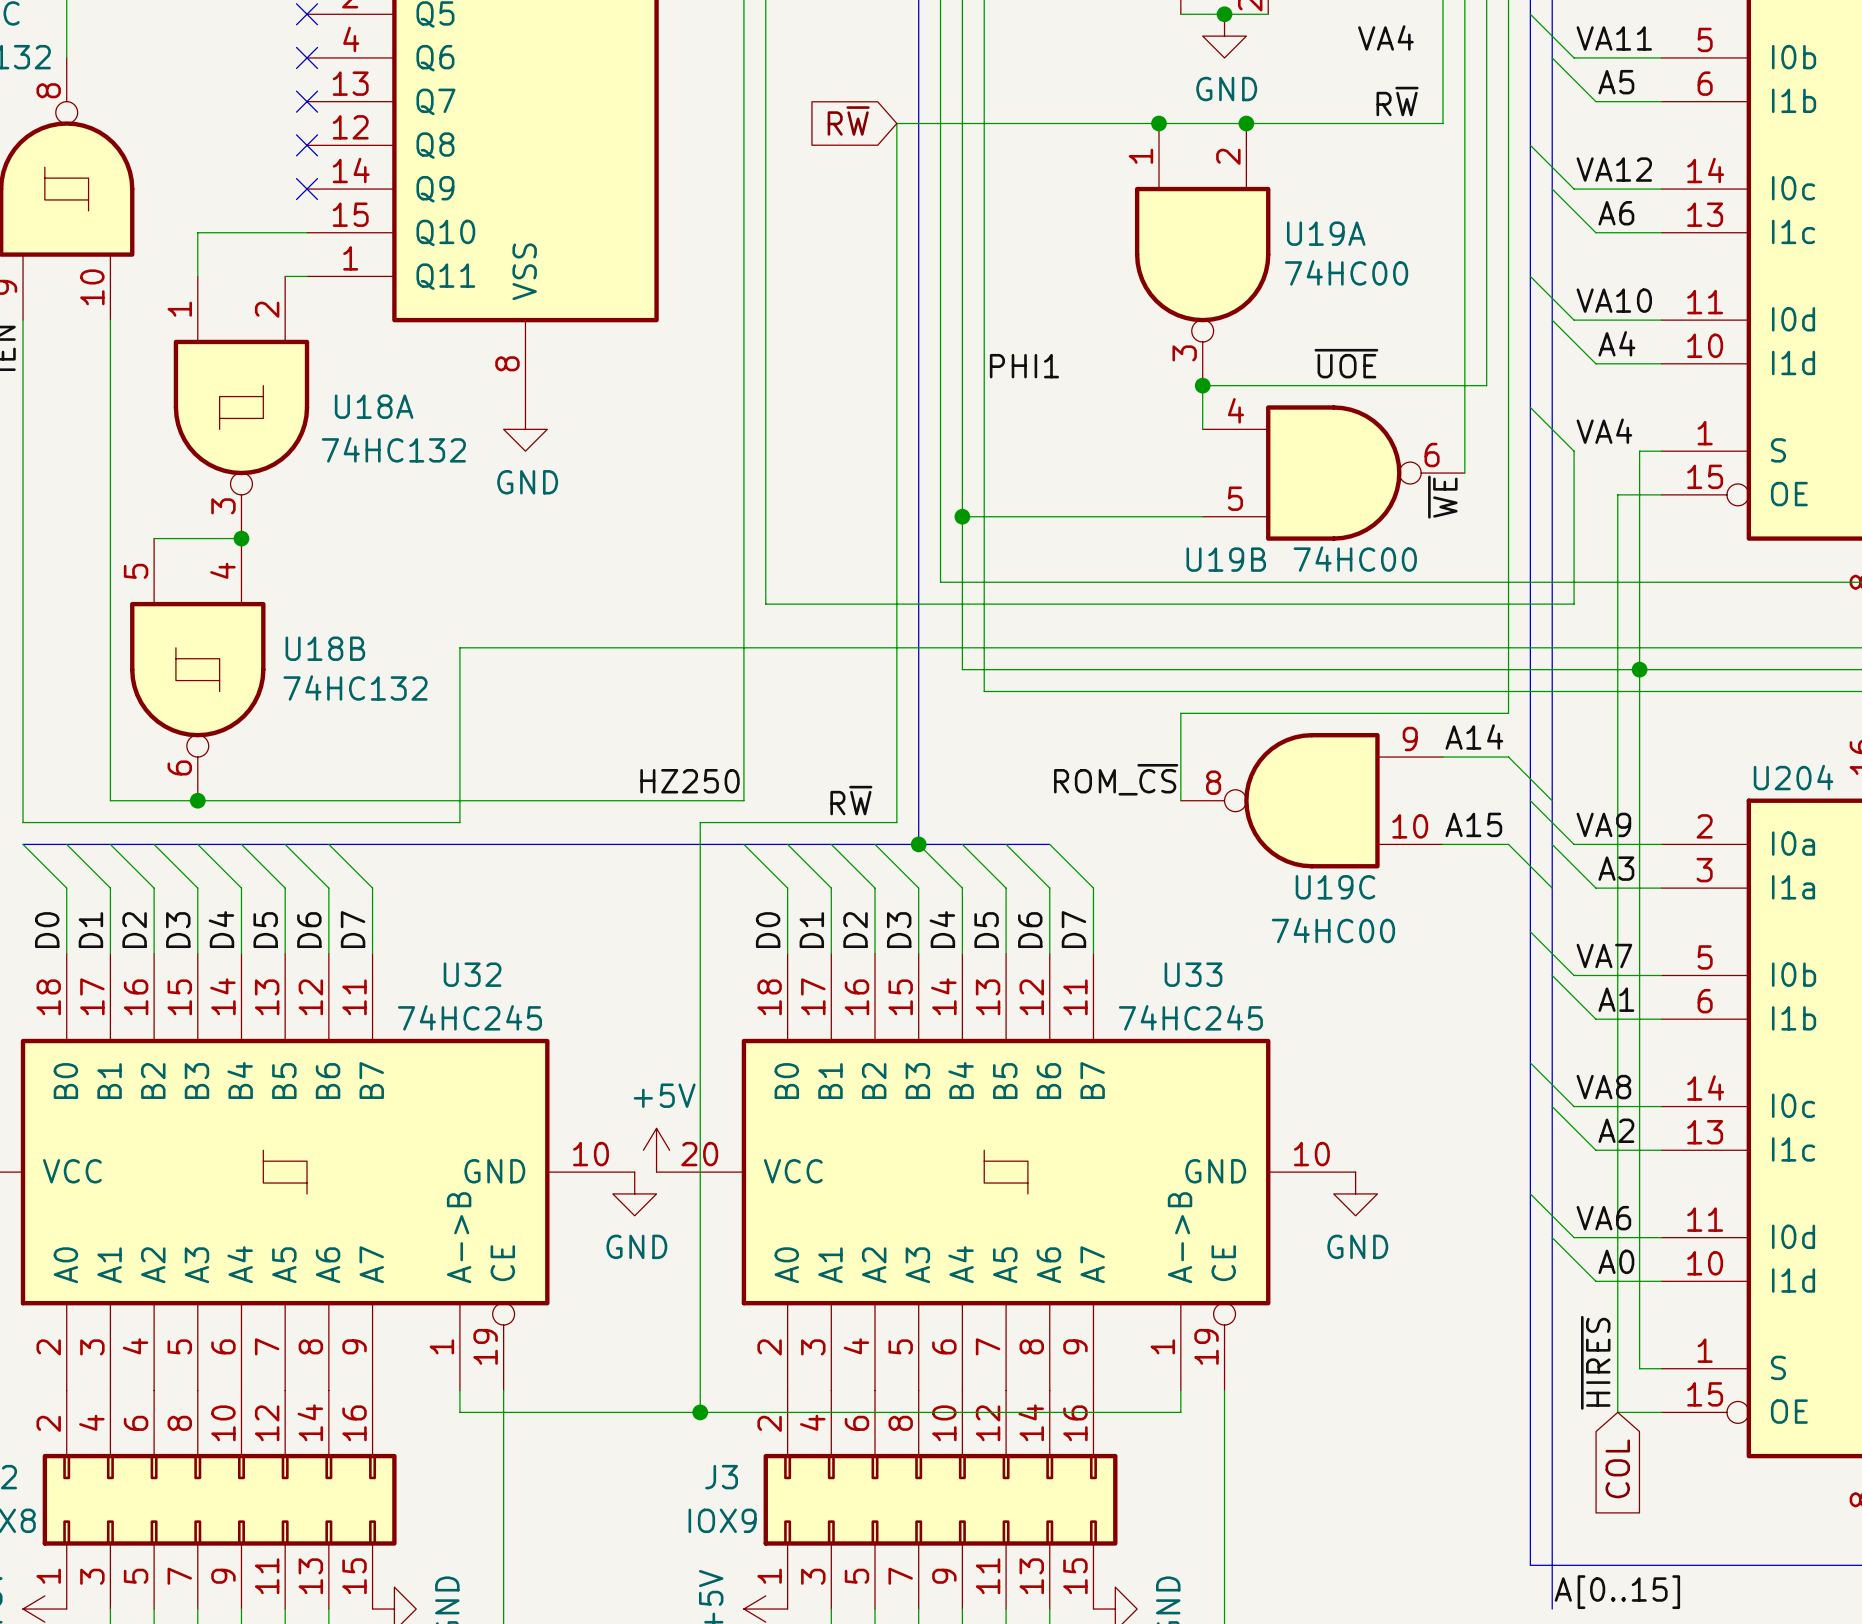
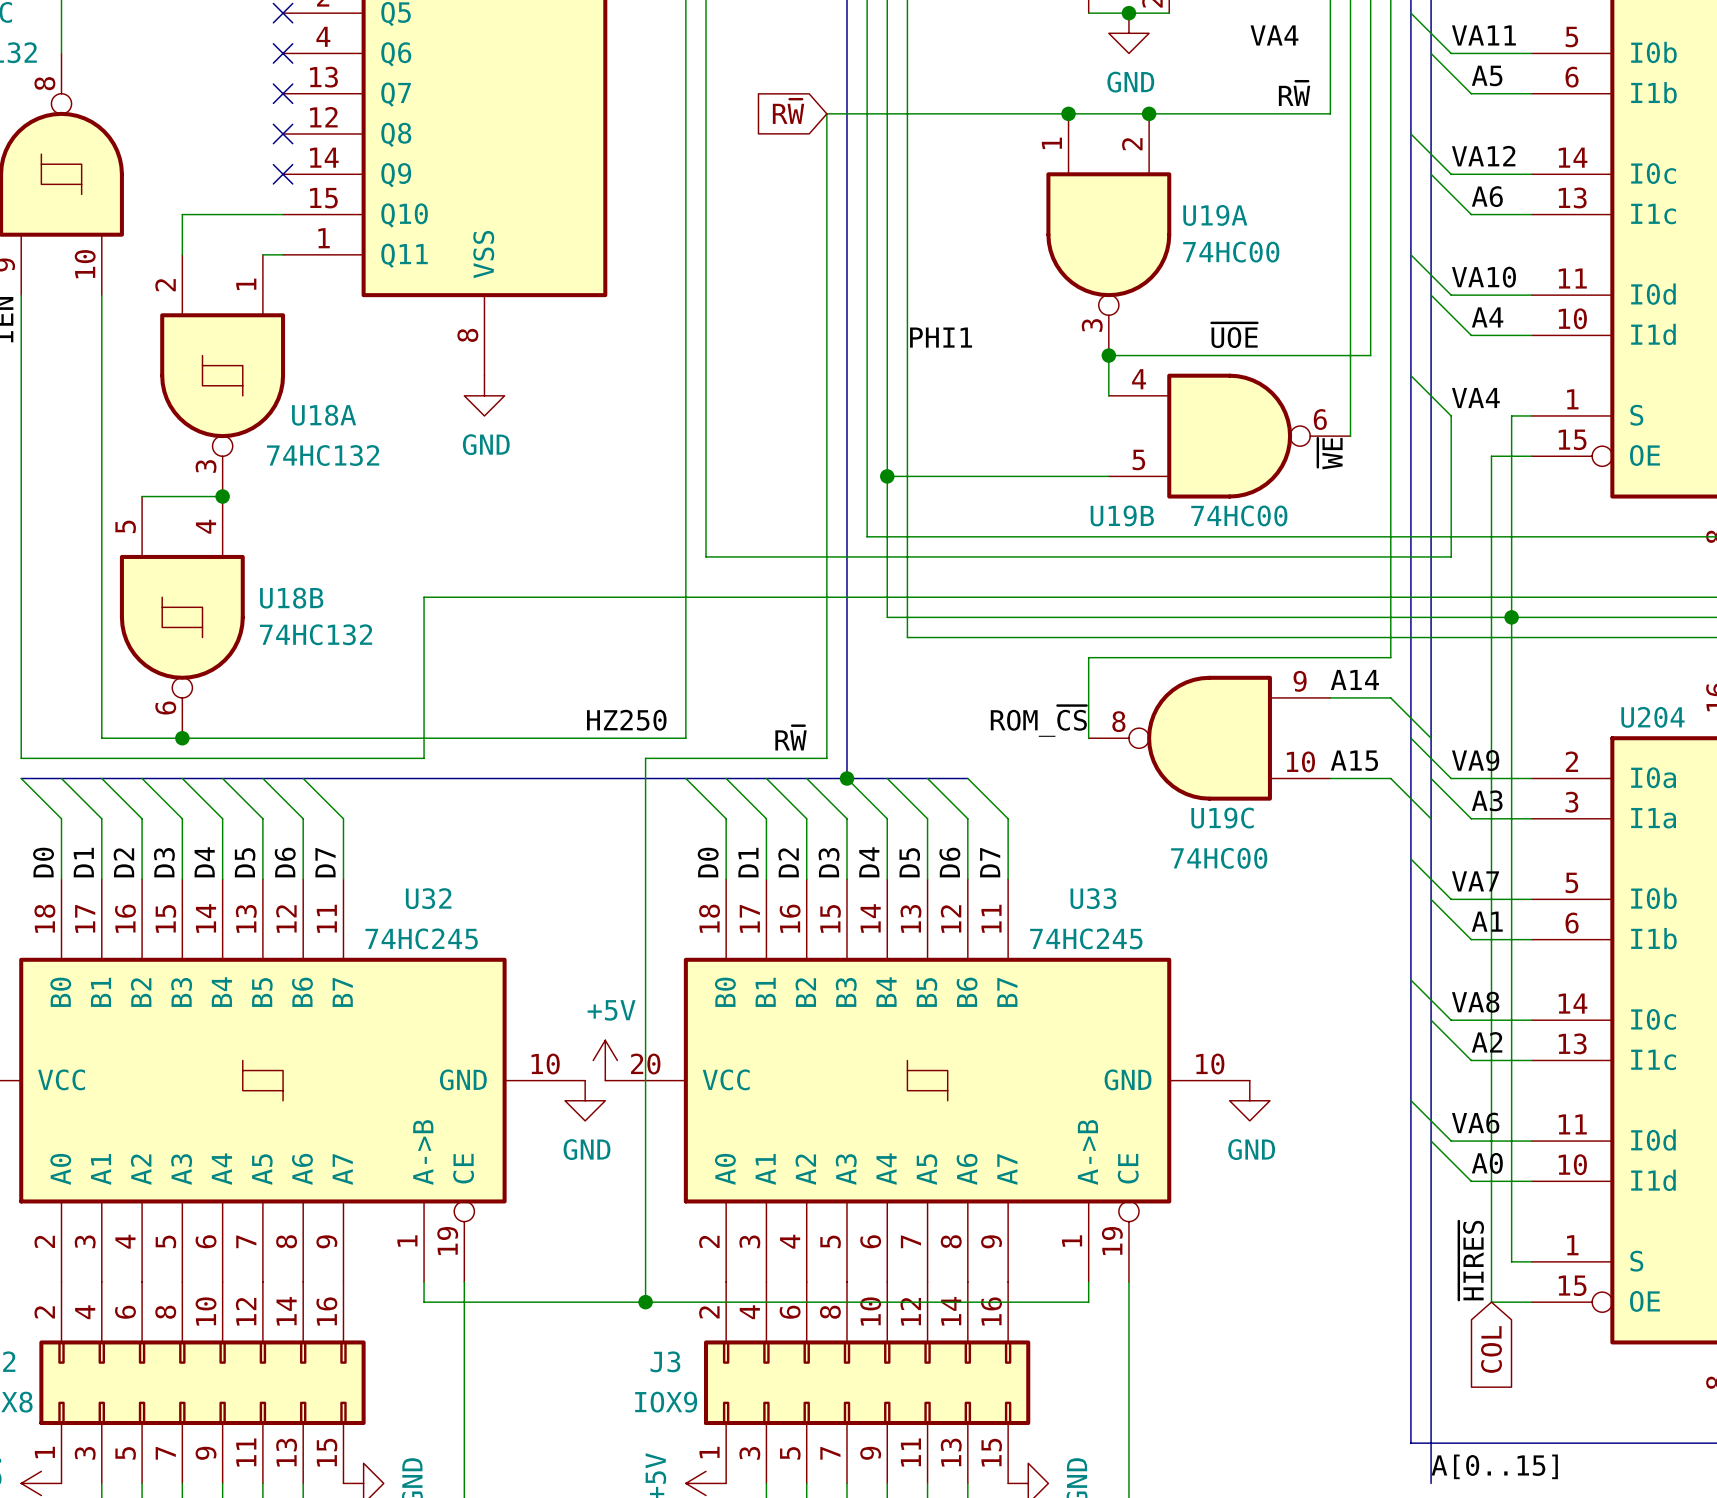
U18A name position: U18A (374, 406) -> U18A (324, 415)
U18A flip: as is (241, 407) -> left-right (222, 375)
U18A value position: 74HC132 (393, 449) -> 74HC132 (323, 455)

